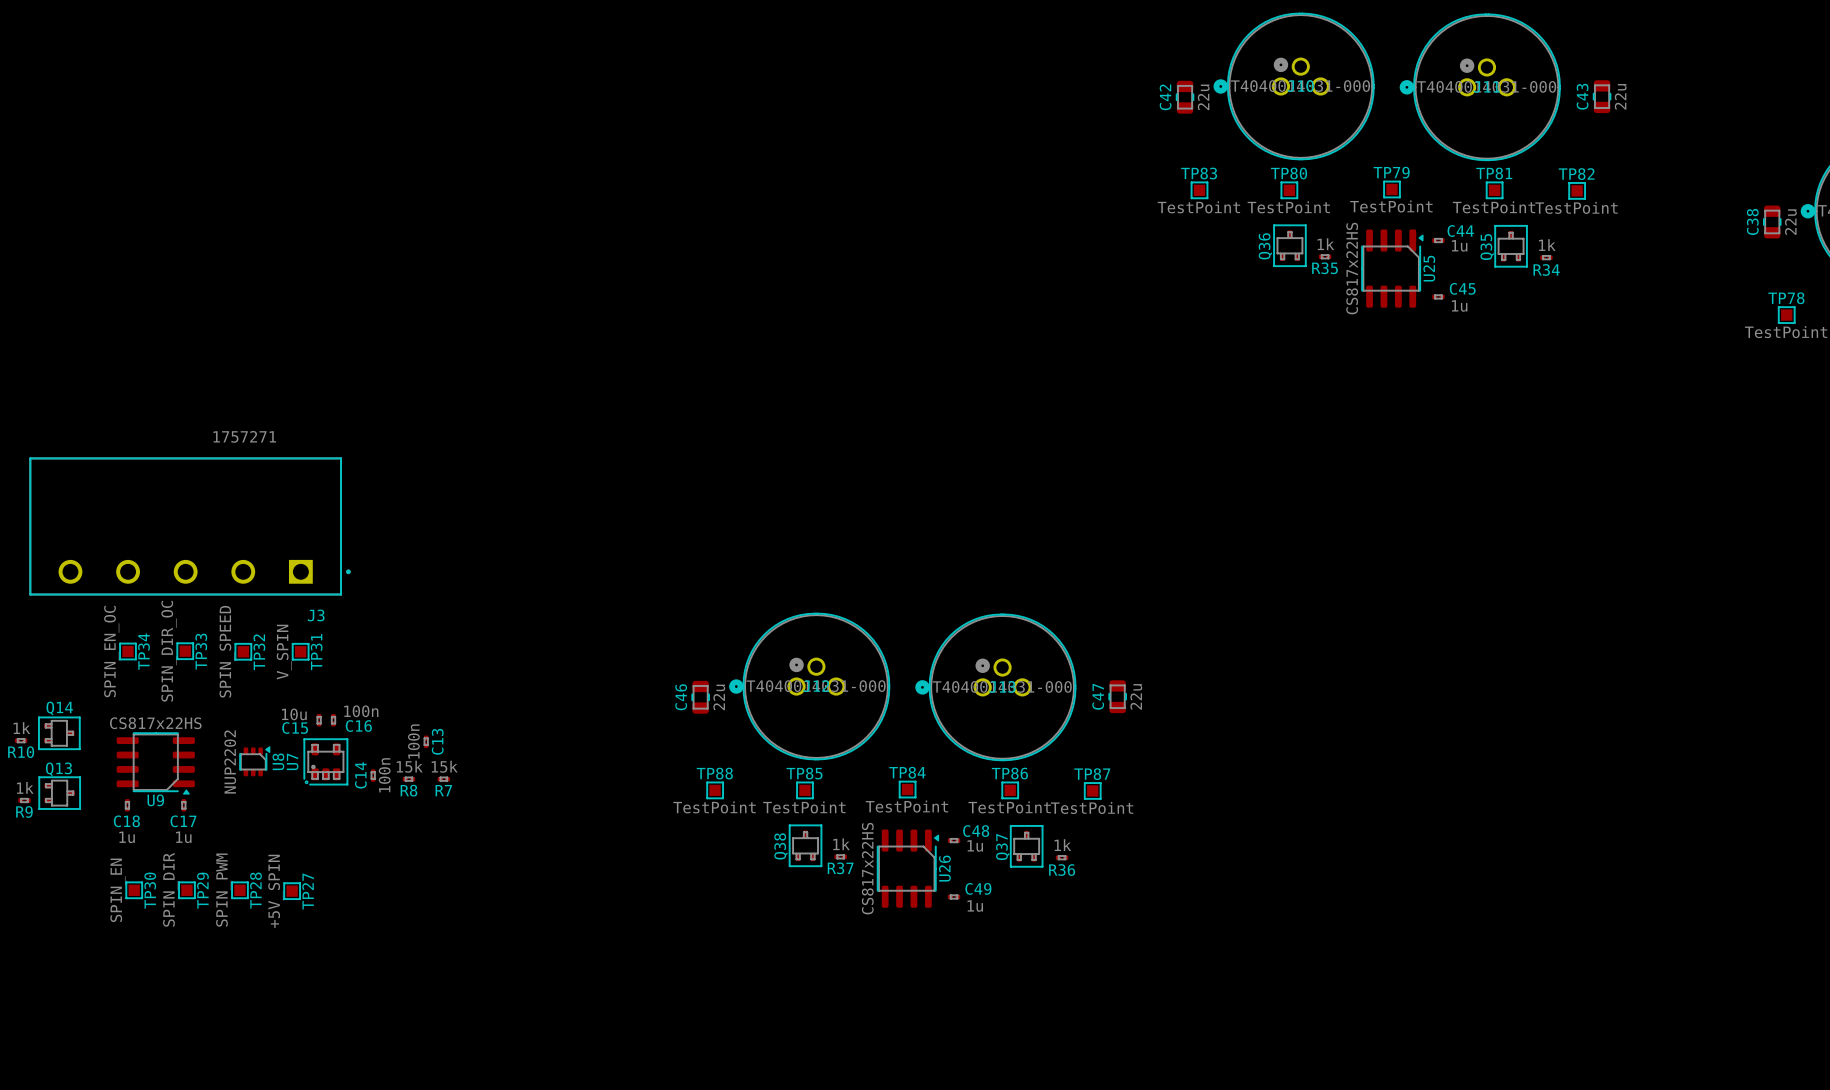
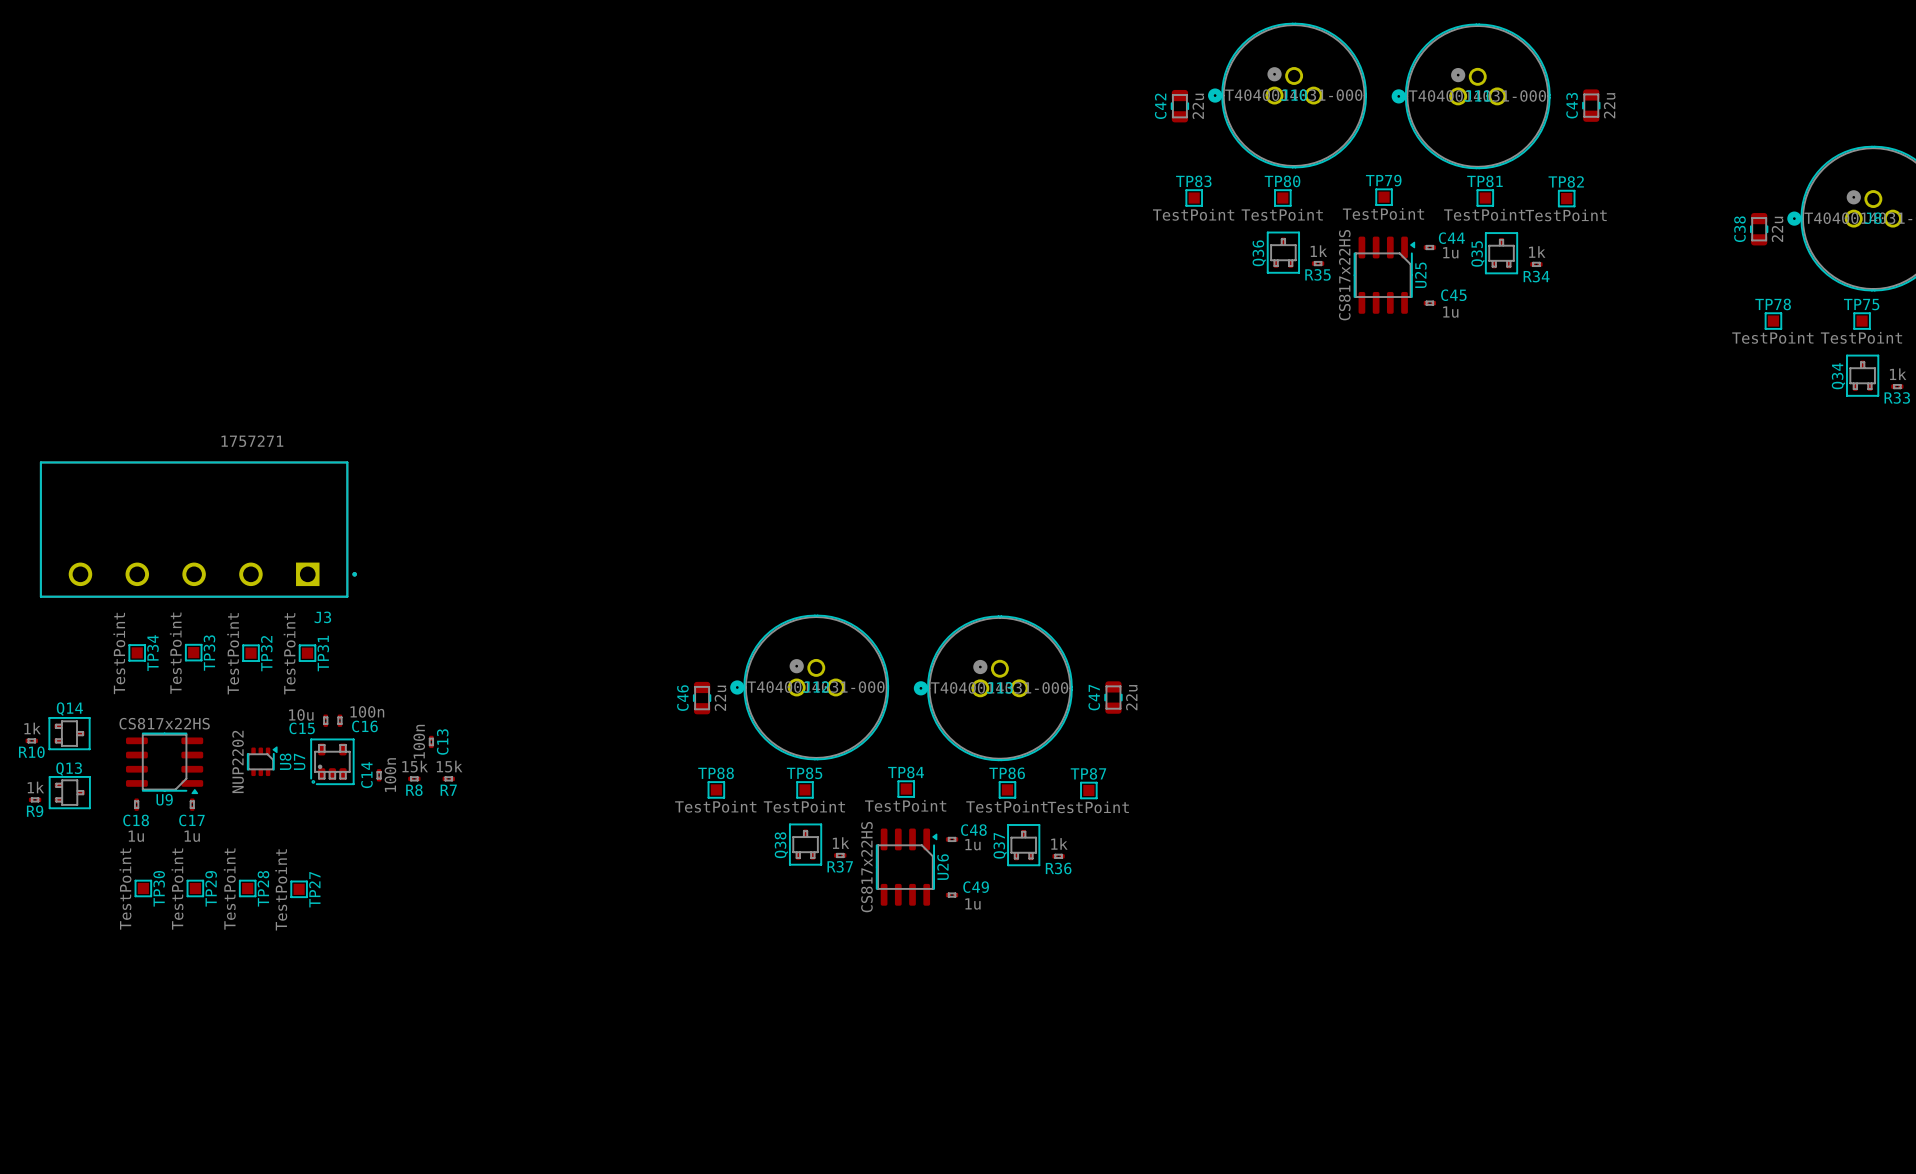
TP34 value: SPIN_EN_OC (111, 651) -> TestPoint (119, 653)
TP33 value: SPIN_DIR_OC (168, 651) -> TestPoint (175, 653)
TP32 value: SPIN_SPEED (227, 651) -> TestPoint (233, 653)
TP31 value: V_SPIN (284, 652) -> TestPoint (289, 653)
TP29 value: SPIN_DIR (170, 889) -> TestPoint (177, 889)
TP30 value: SPIN_EN (117, 890) -> TestPoint (125, 889)
TP28 value: SPIN_PWM (223, 890) -> TestPoint (229, 889)
TP27 value: +5V_SPIN (275, 891) -> TestPoint (281, 889)

